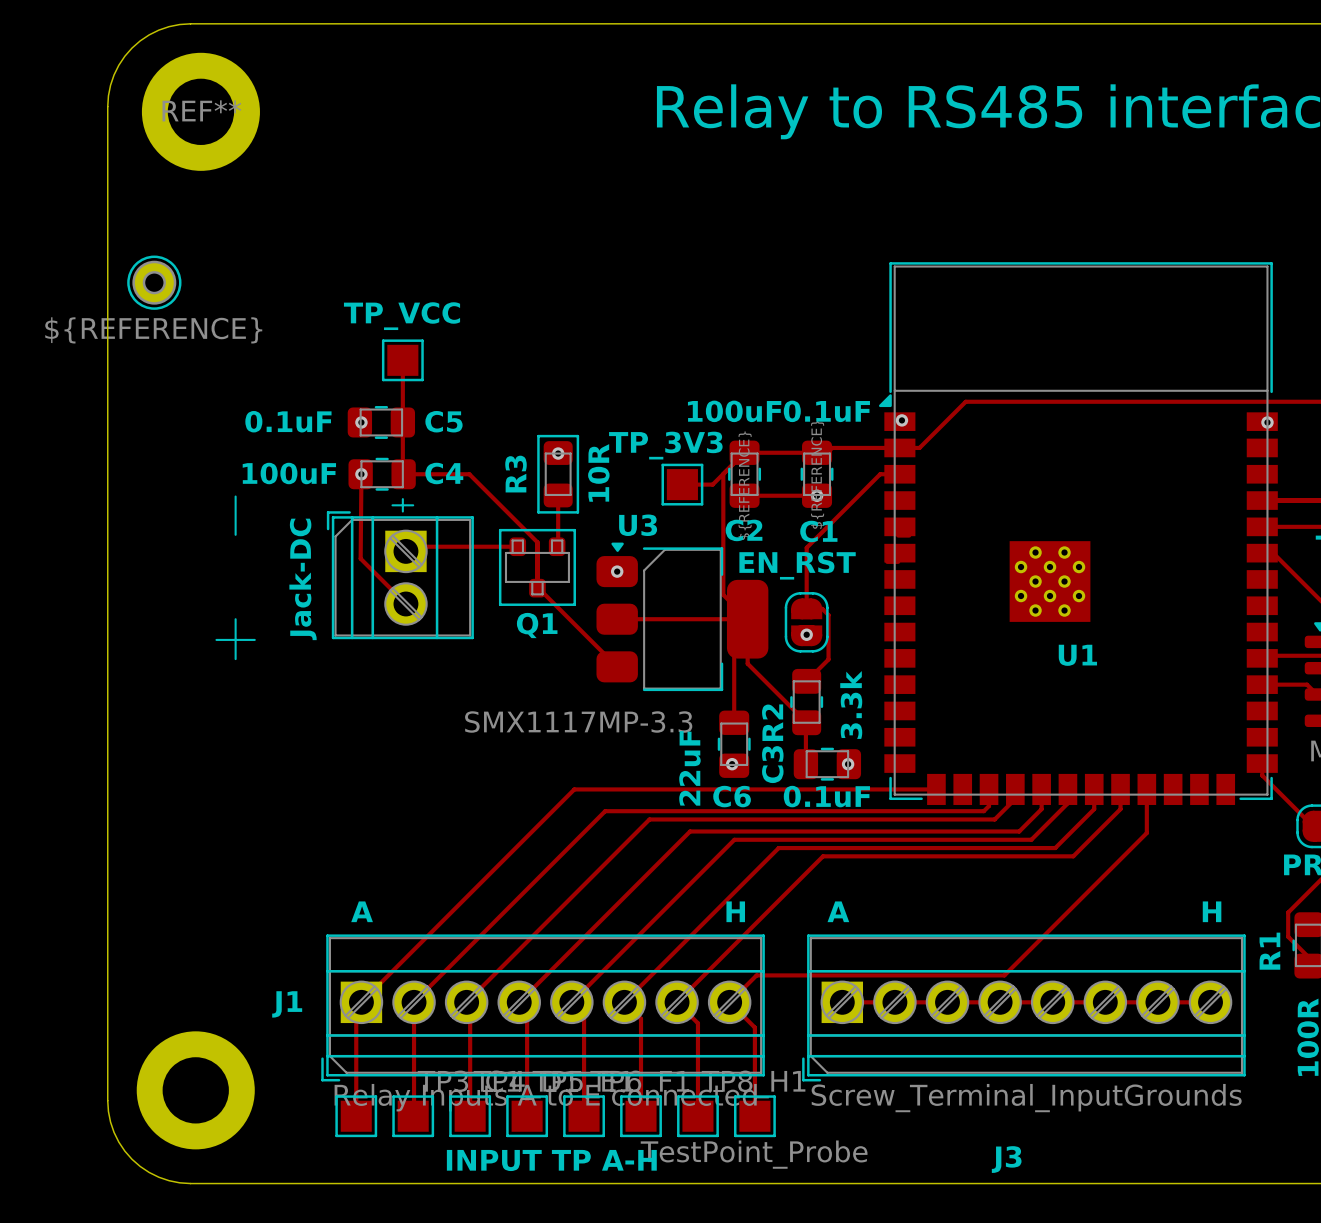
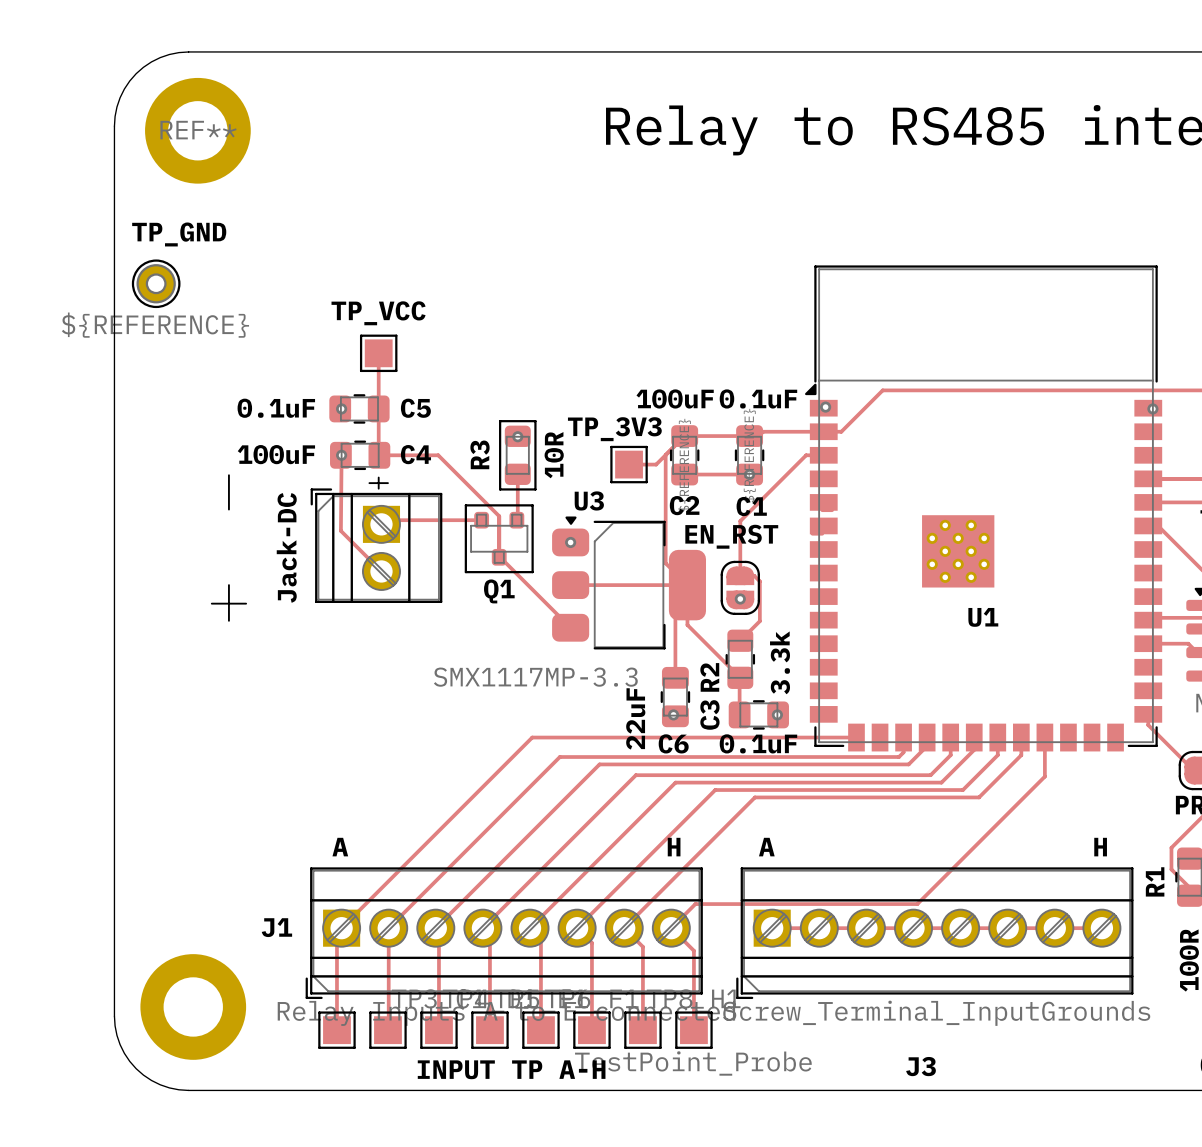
part value: none -> TP_GND (179, 234)

